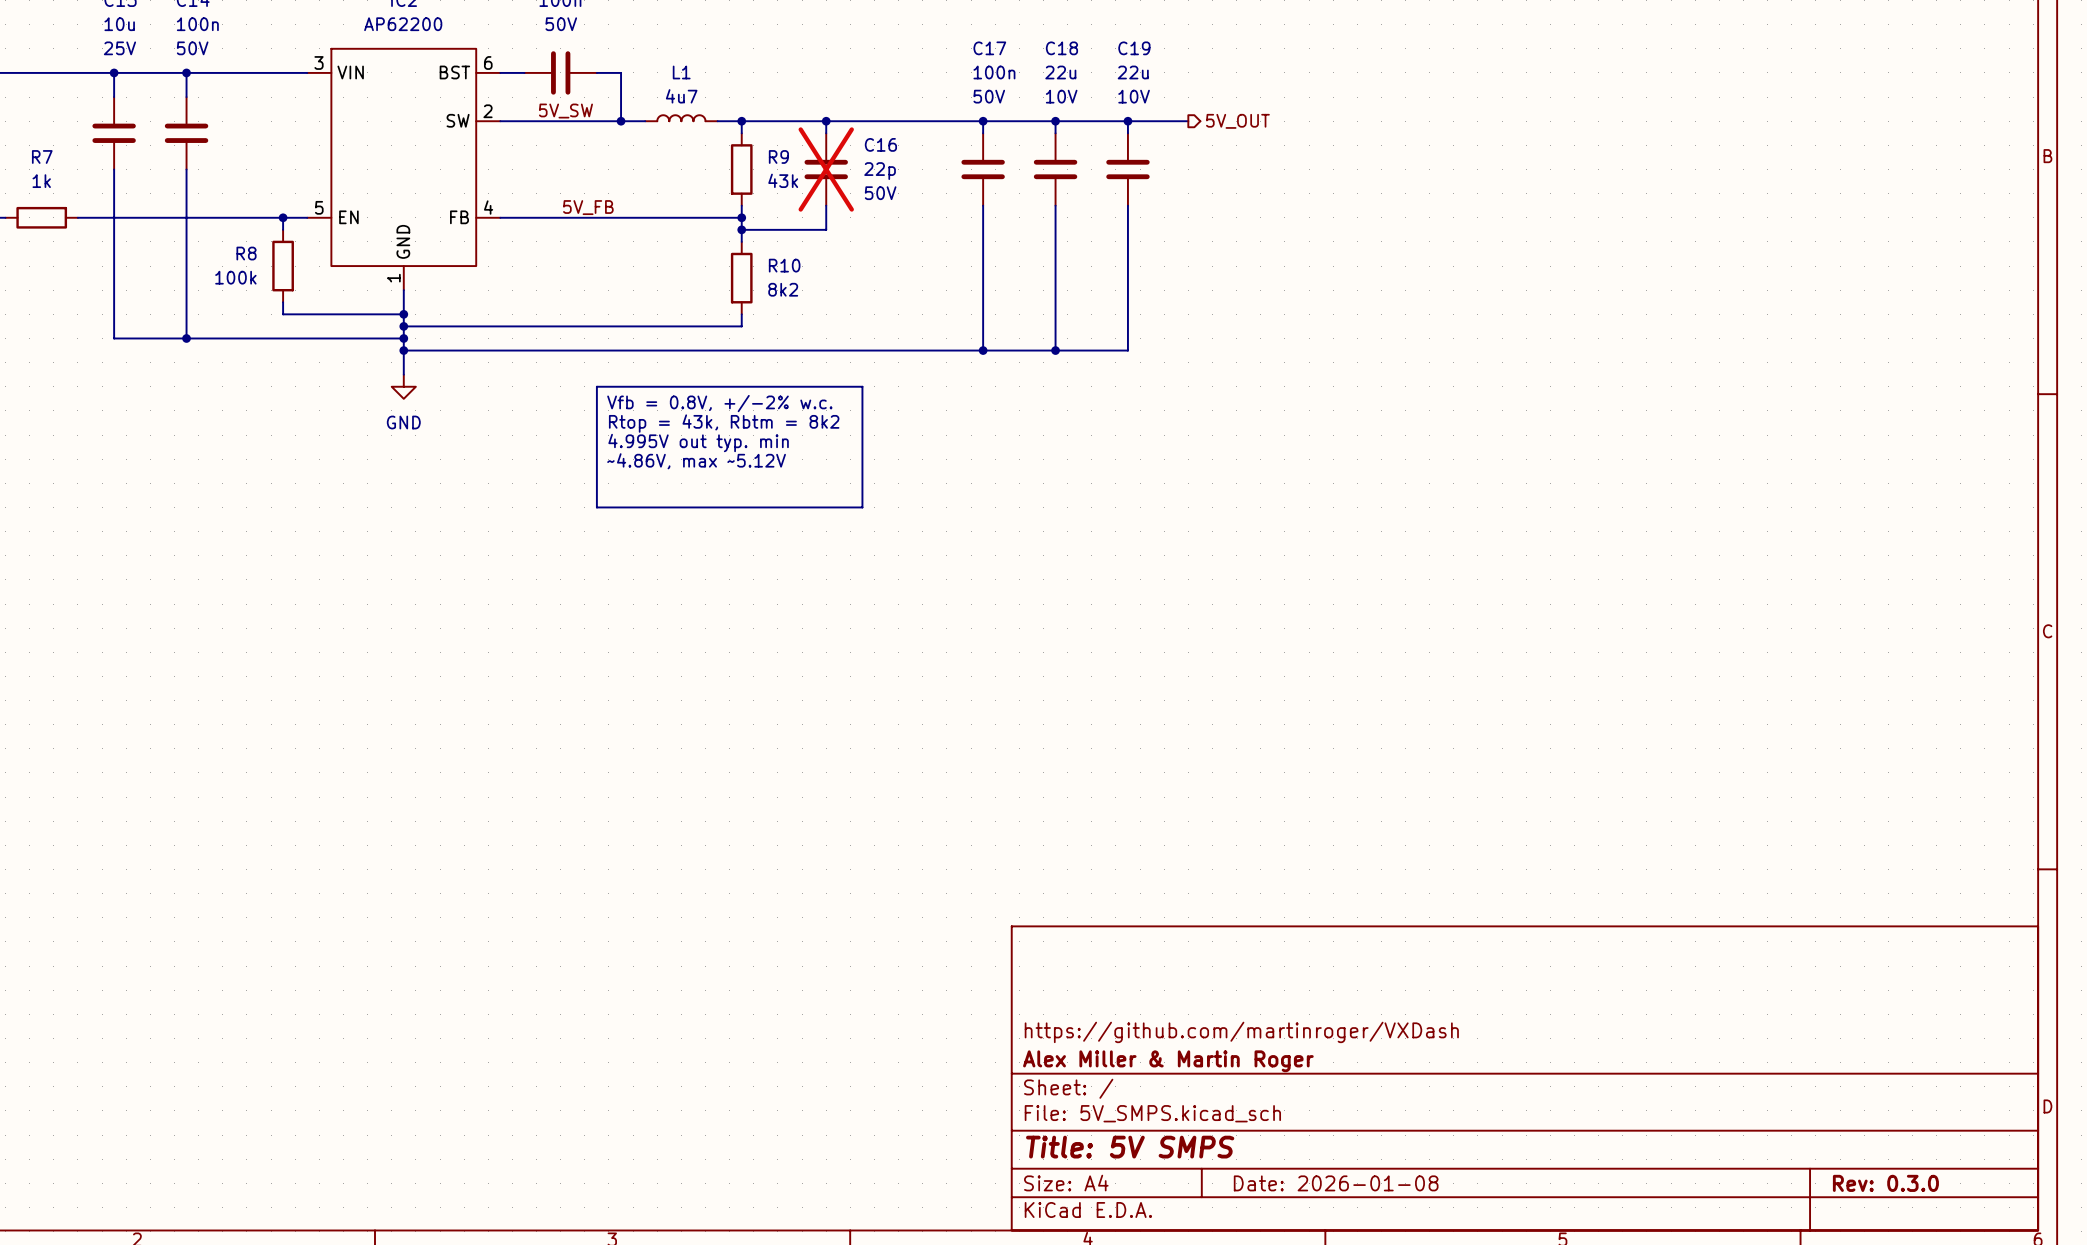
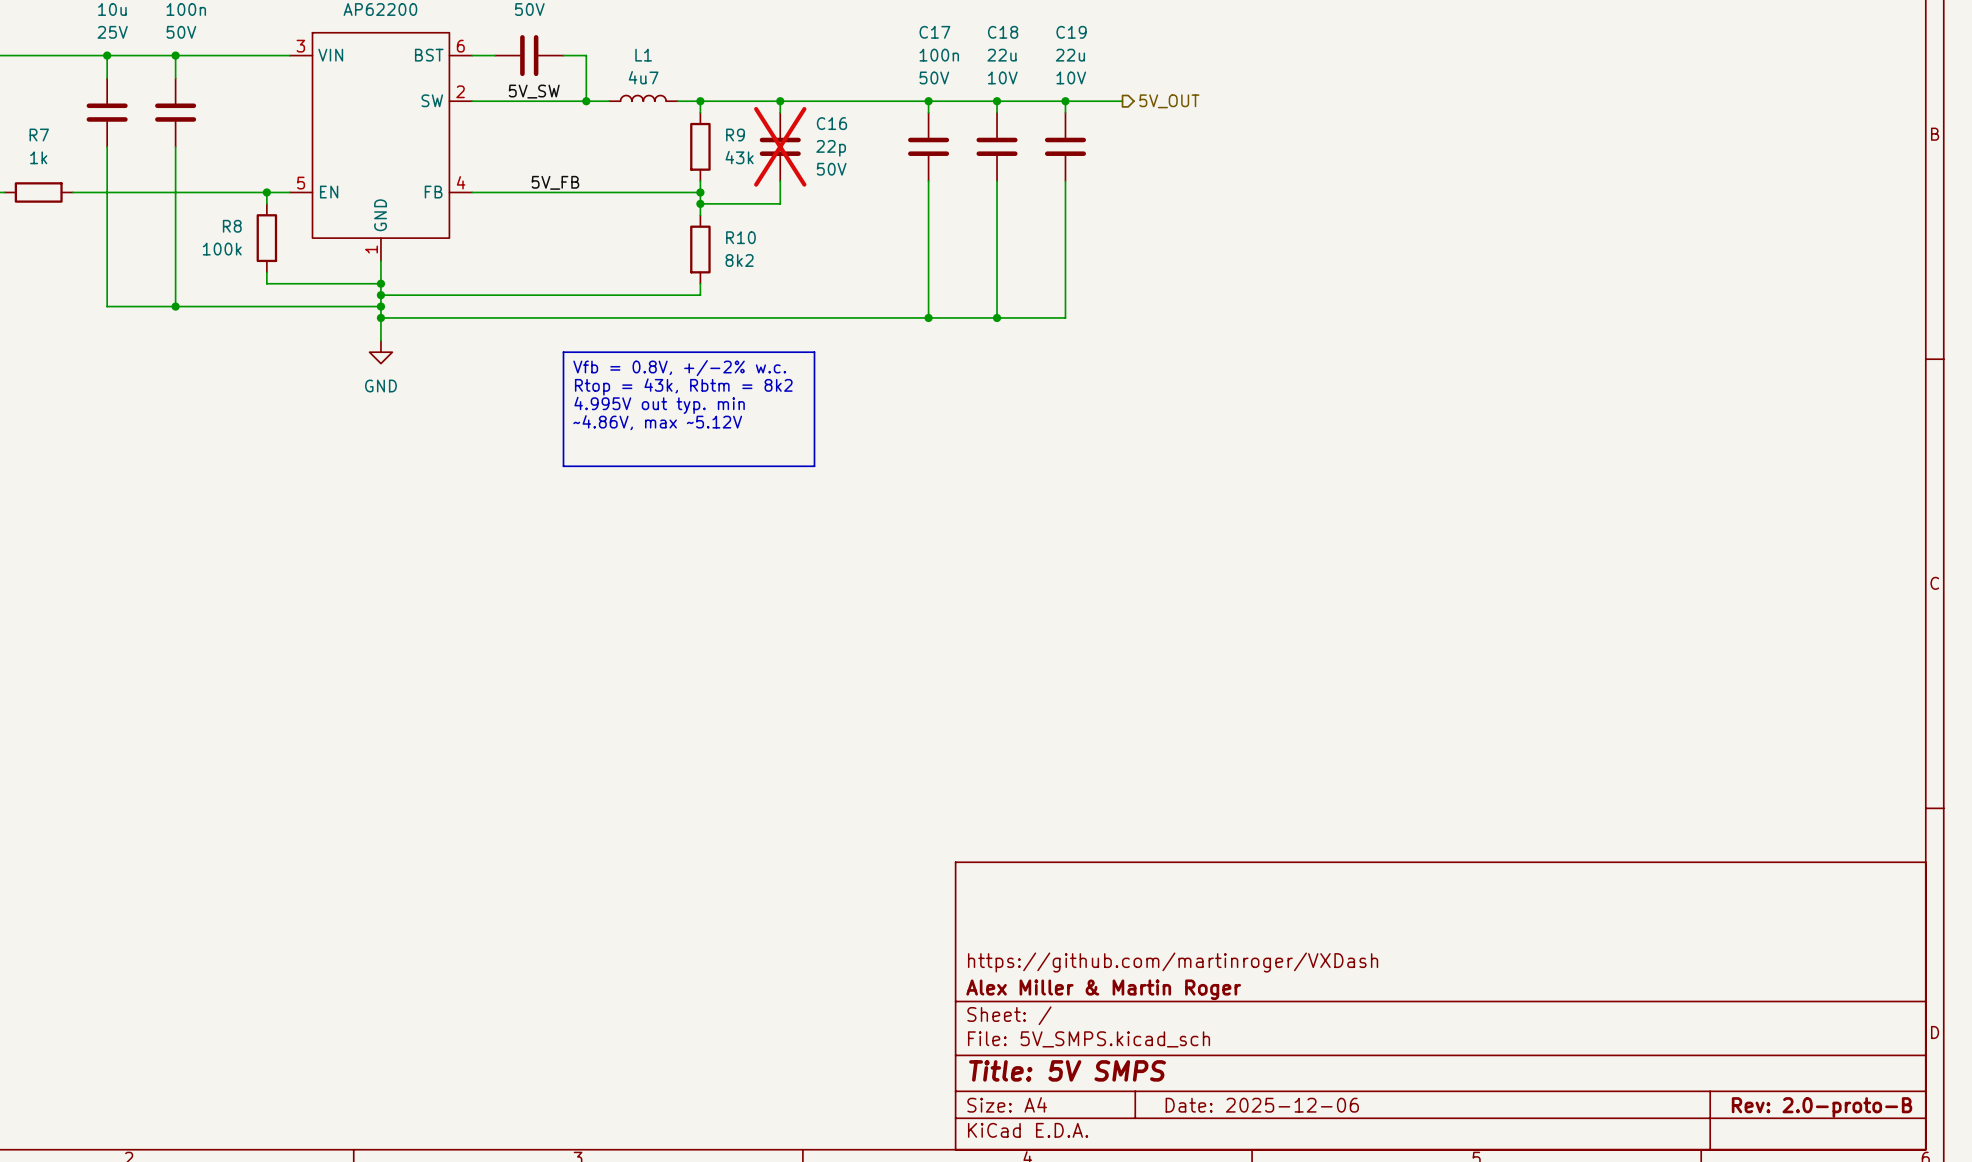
title block: Date: 2026-01-08 (1336, 1183) -> Date: 2025-12-06 (1262, 1105)
title block: Rev: 0.3.0 (1885, 1183) -> Rev: 2.0-proto-B (1822, 1107)

